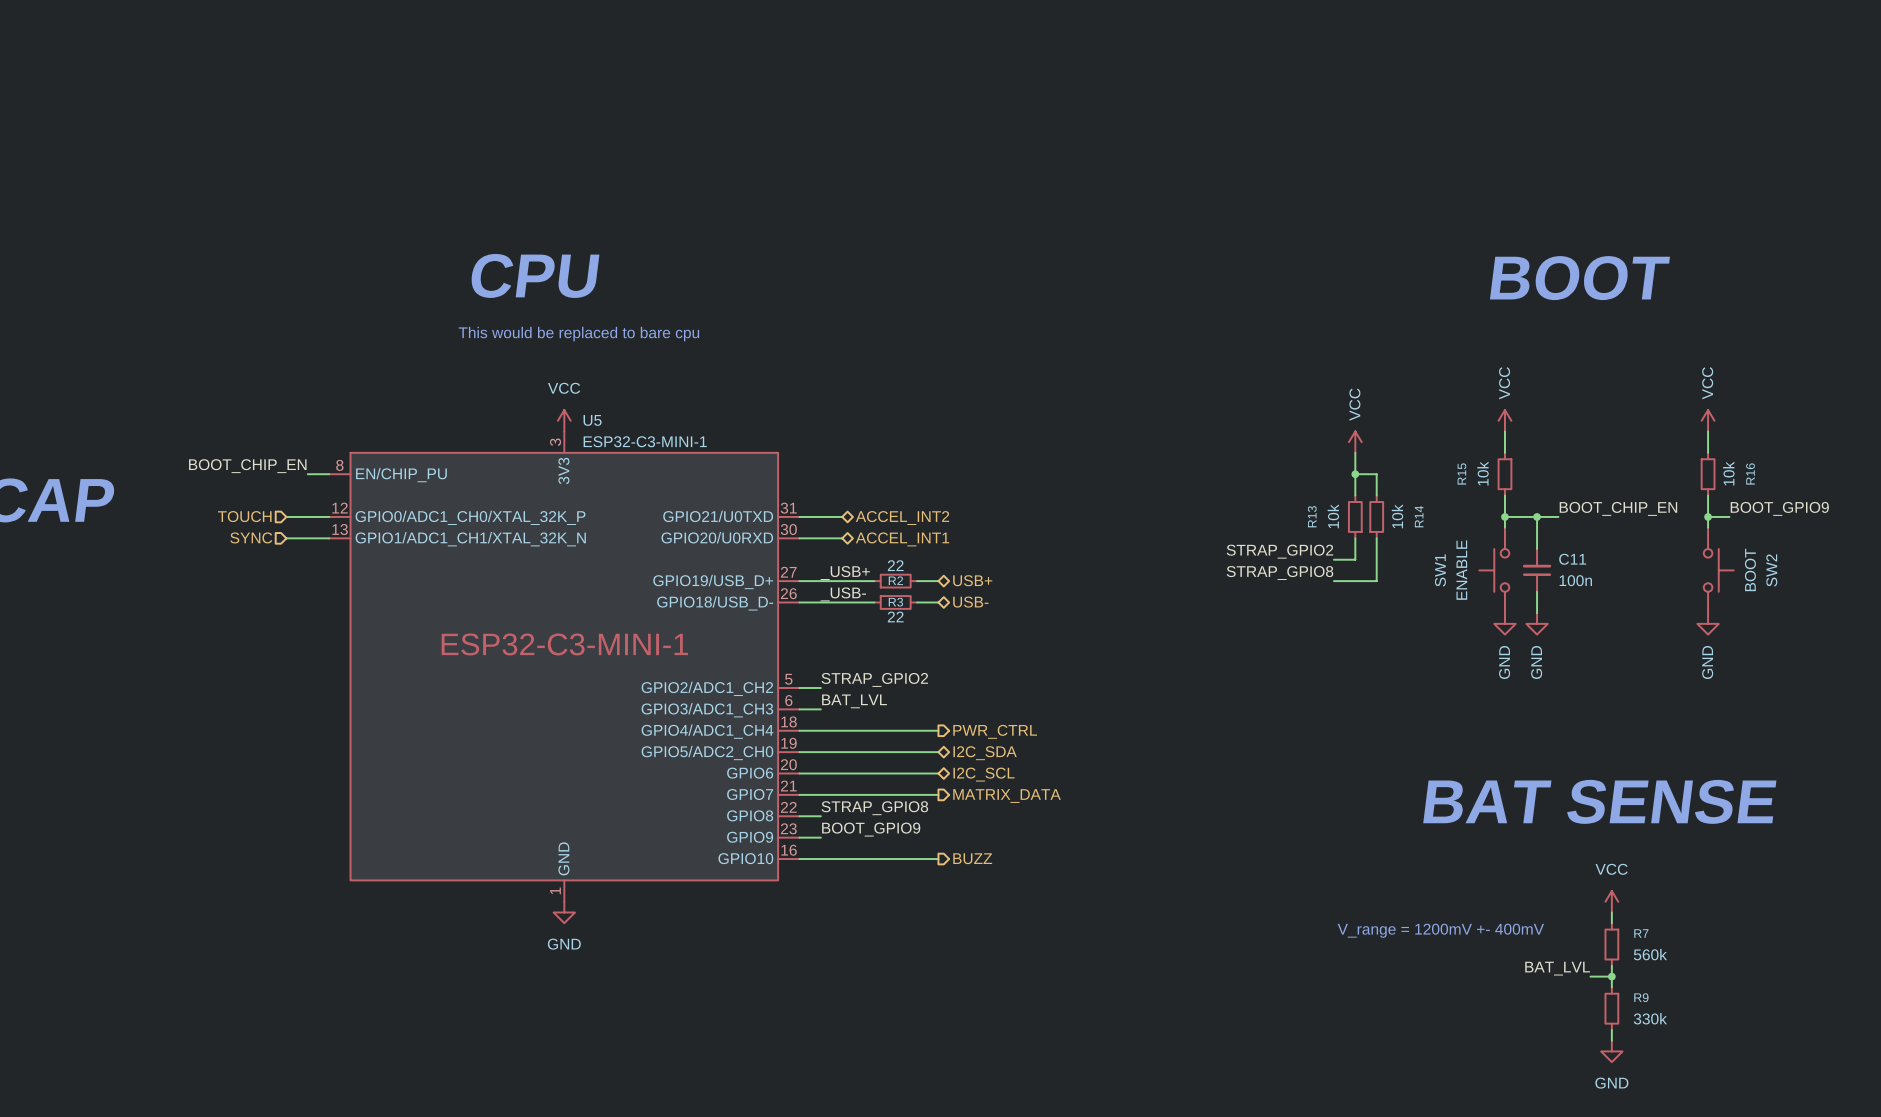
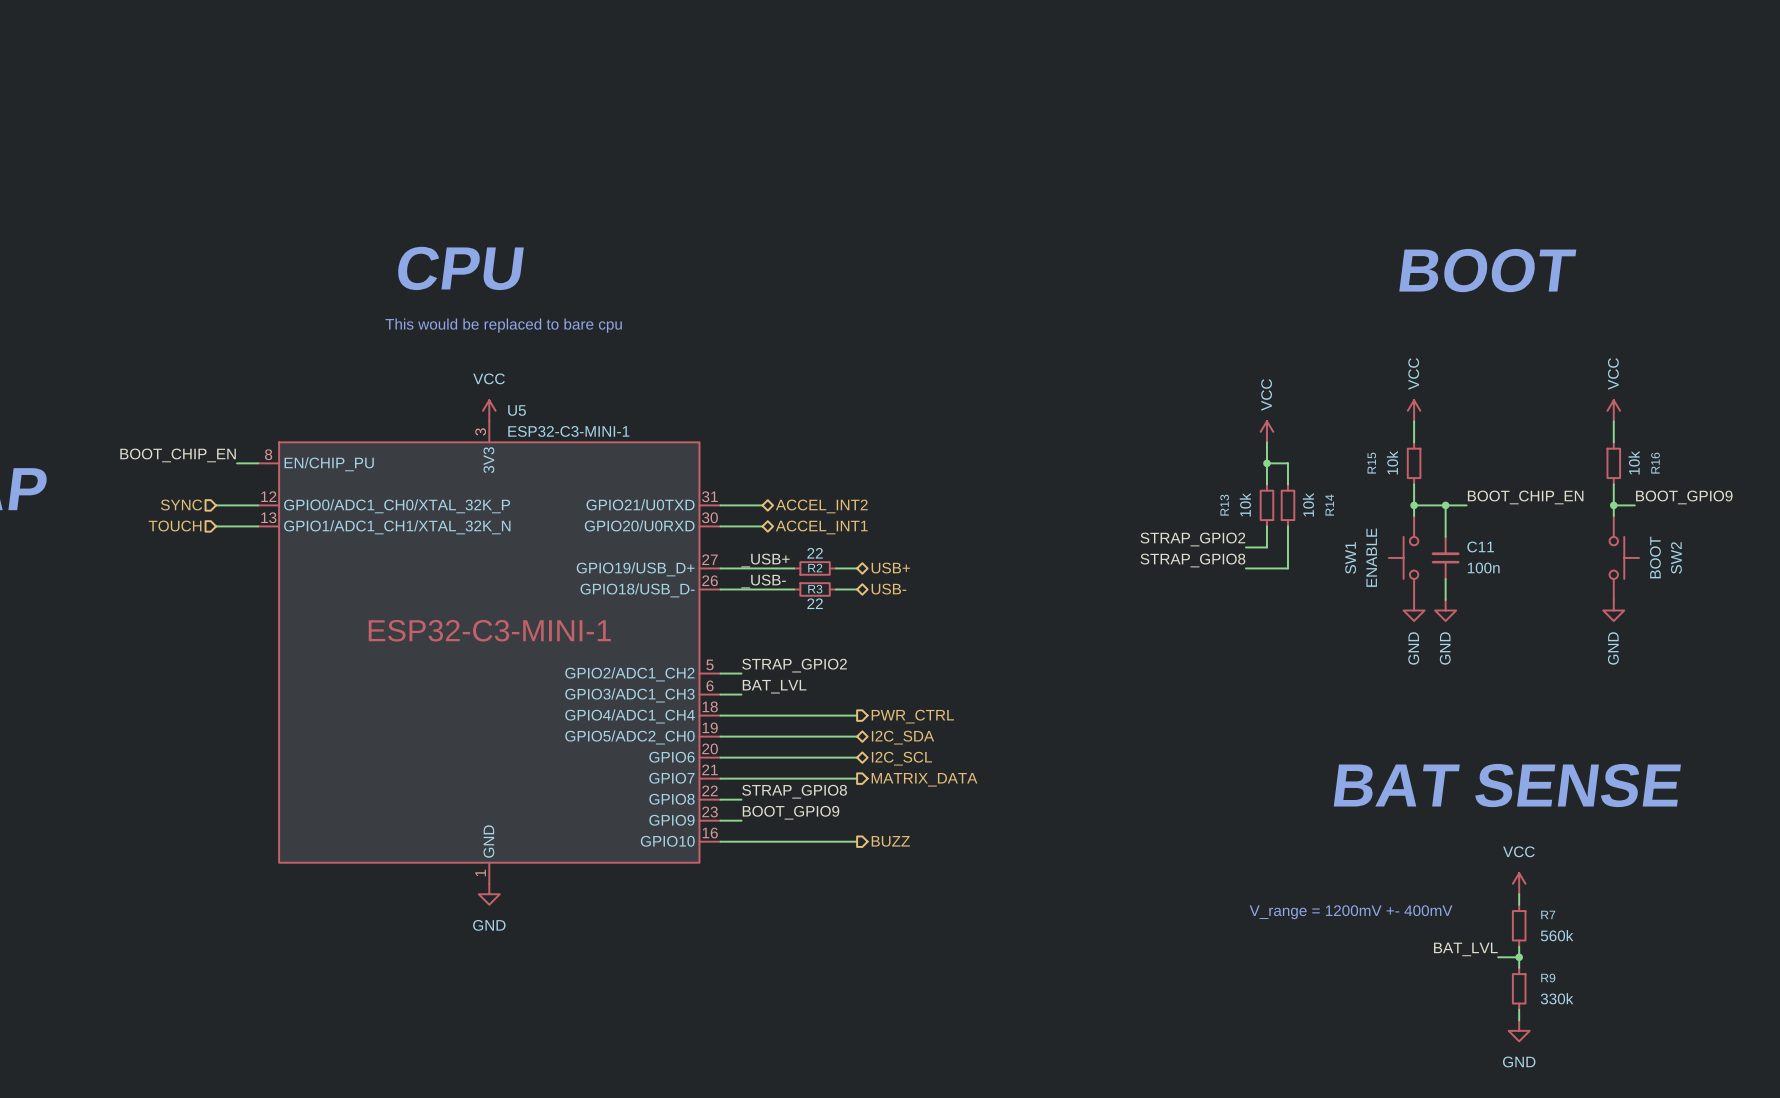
hierarchical label: TOUCH (244, 516) -> SYNC (181, 505)
hierarchical label: SYNC (251, 537) -> TOUCH (175, 526)

